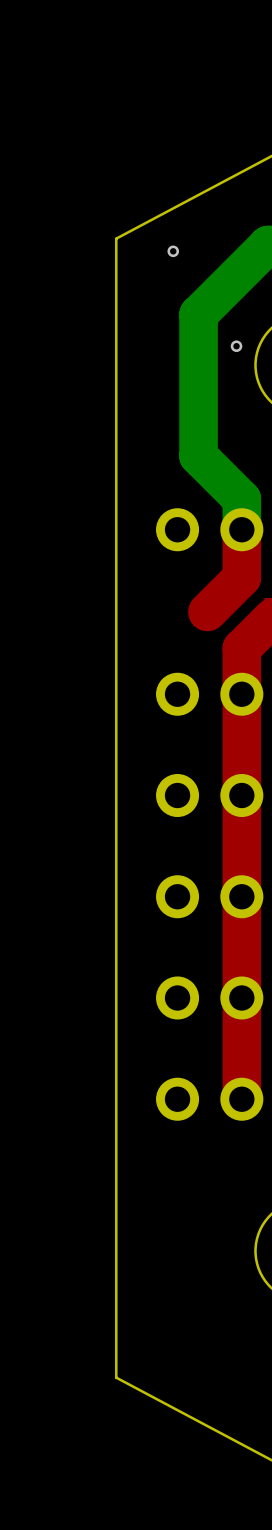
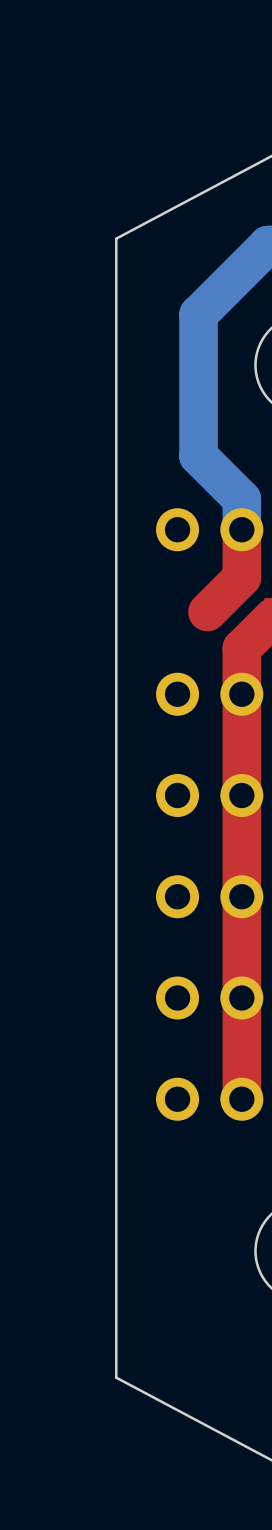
via: (173, 251) -> none
via: (236, 346) -> none

